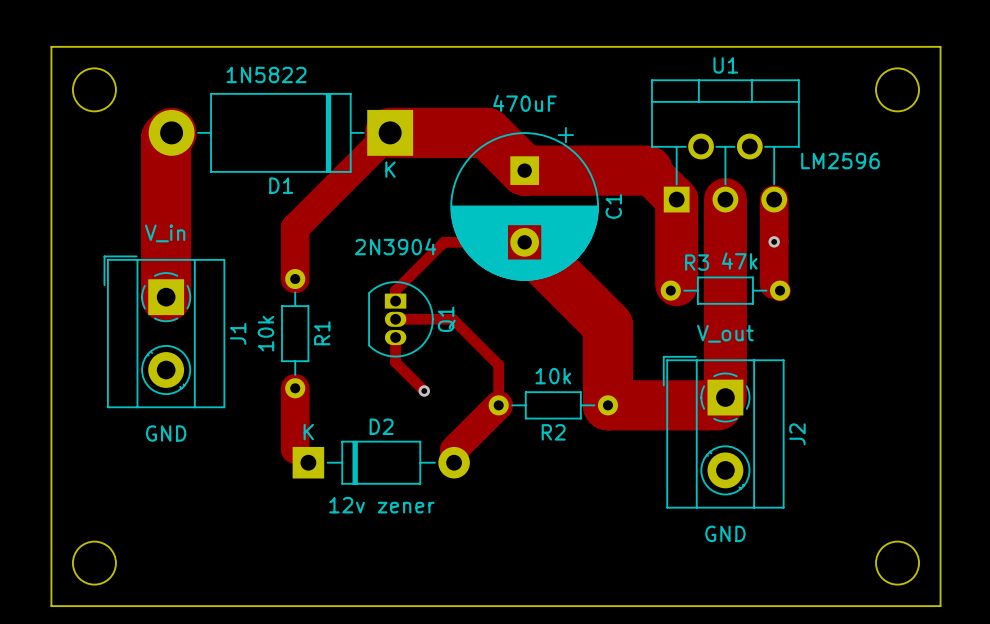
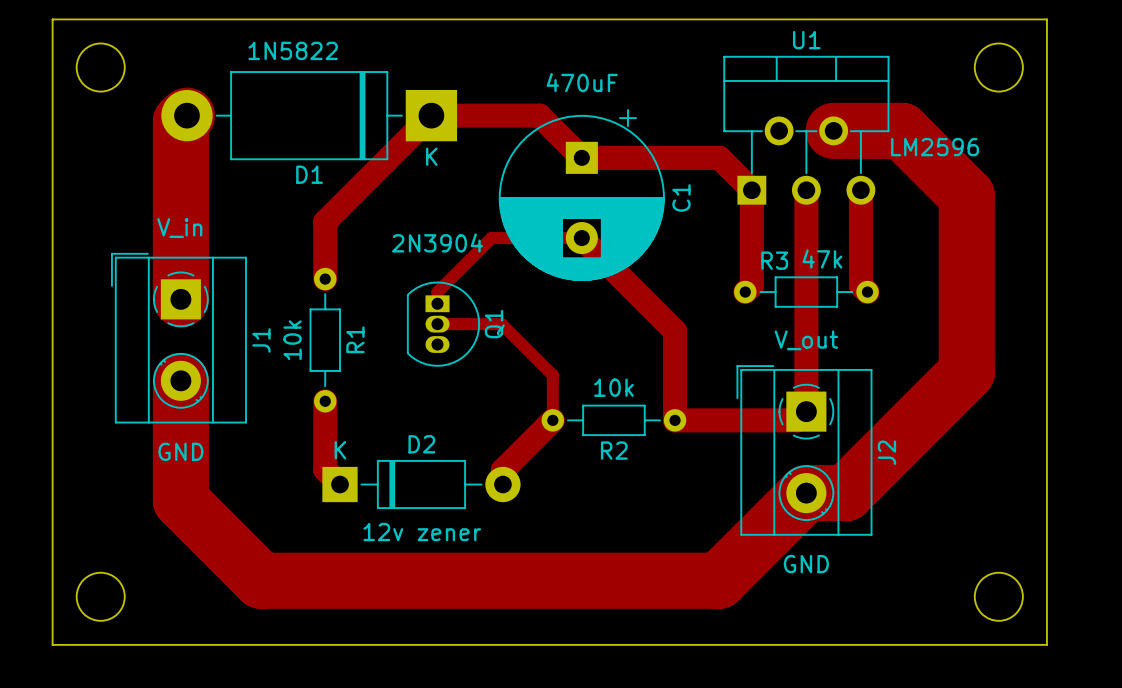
track: none -> (833, 130) (901, 130) (966, 195) (966, 372) (845, 493) (806, 493) (718, 580) (261, 580) (180, 500) (180, 380)
track width: thick (725, 199) (725, 397) -> thin (806, 190) (806, 411)
track width: thick (774, 199) (774, 284) -> thin (860, 190) (860, 285)
via: (774, 241) -> none
track width: thick (524, 242) (607, 325) (607, 405) (717, 405) -> thin (581, 238) (675, 331) (675, 420) (797, 420)
track width: thick (295, 279) (295, 227) (390, 132) (486, 132) (524, 170) (647, 170) (676, 199) (676, 284) -> thin (325, 279) (325, 221) (431, 115) (539, 115) (581, 157) (719, 157) (751, 190) (751, 285)
track: (395, 337) (395, 362) (424, 391) -> none
track width: thick (295, 388) (295, 449) -> thin (325, 401) (325, 469)
via: (424, 391) -> none
track width: thick (498, 405) (454, 449) -> thin (552, 420) (502, 470)

